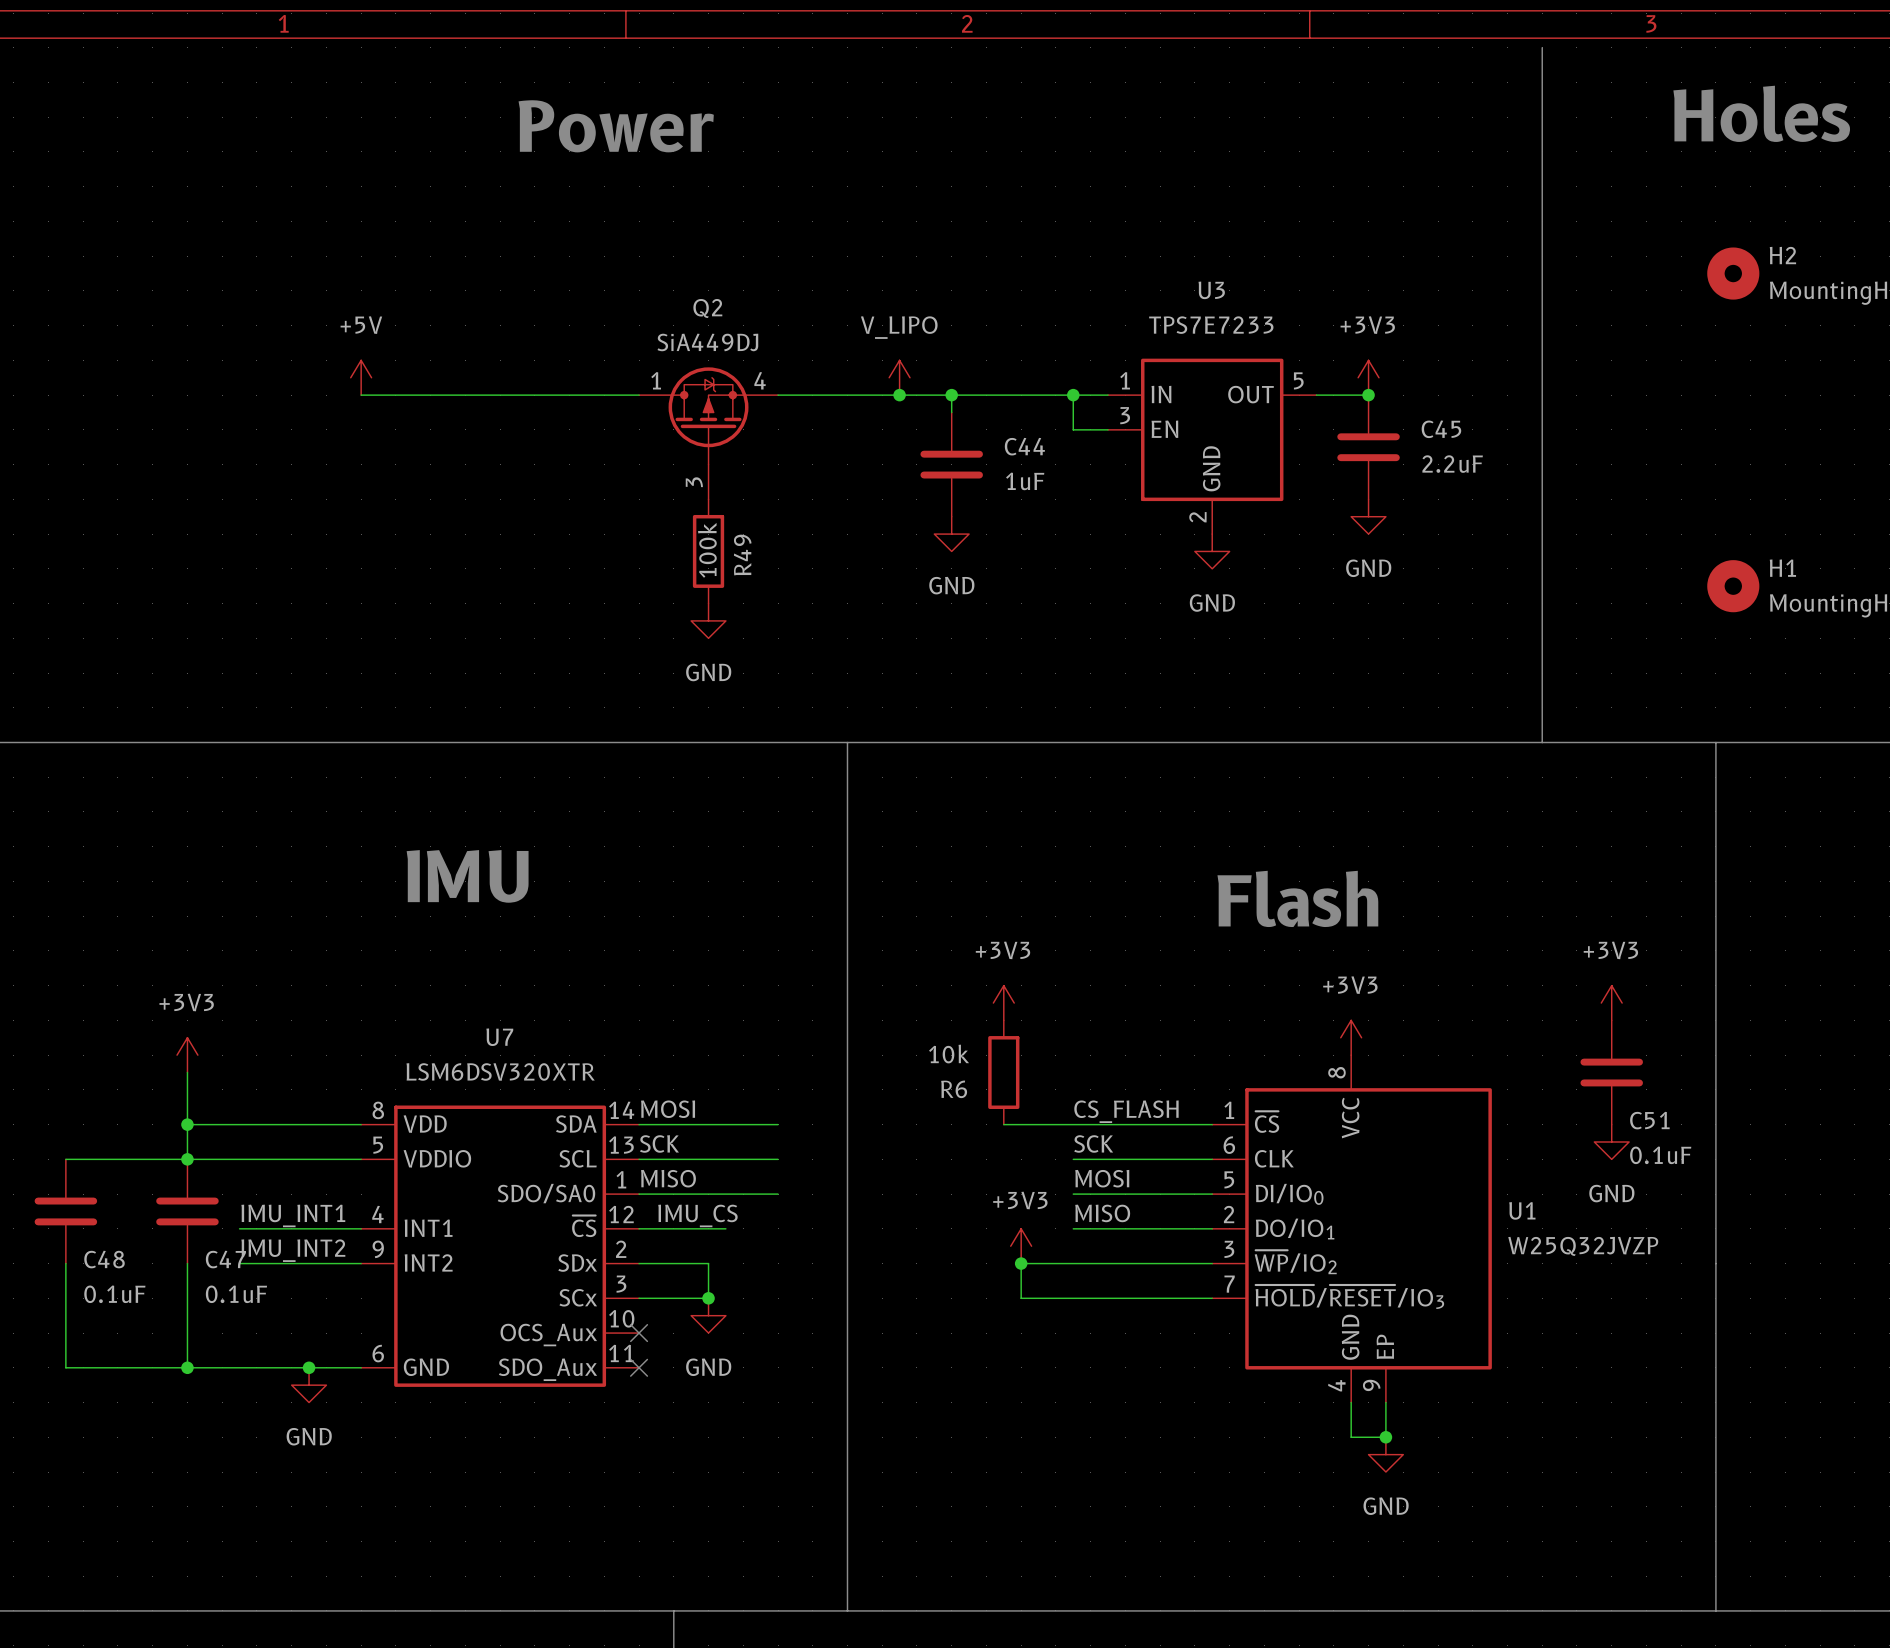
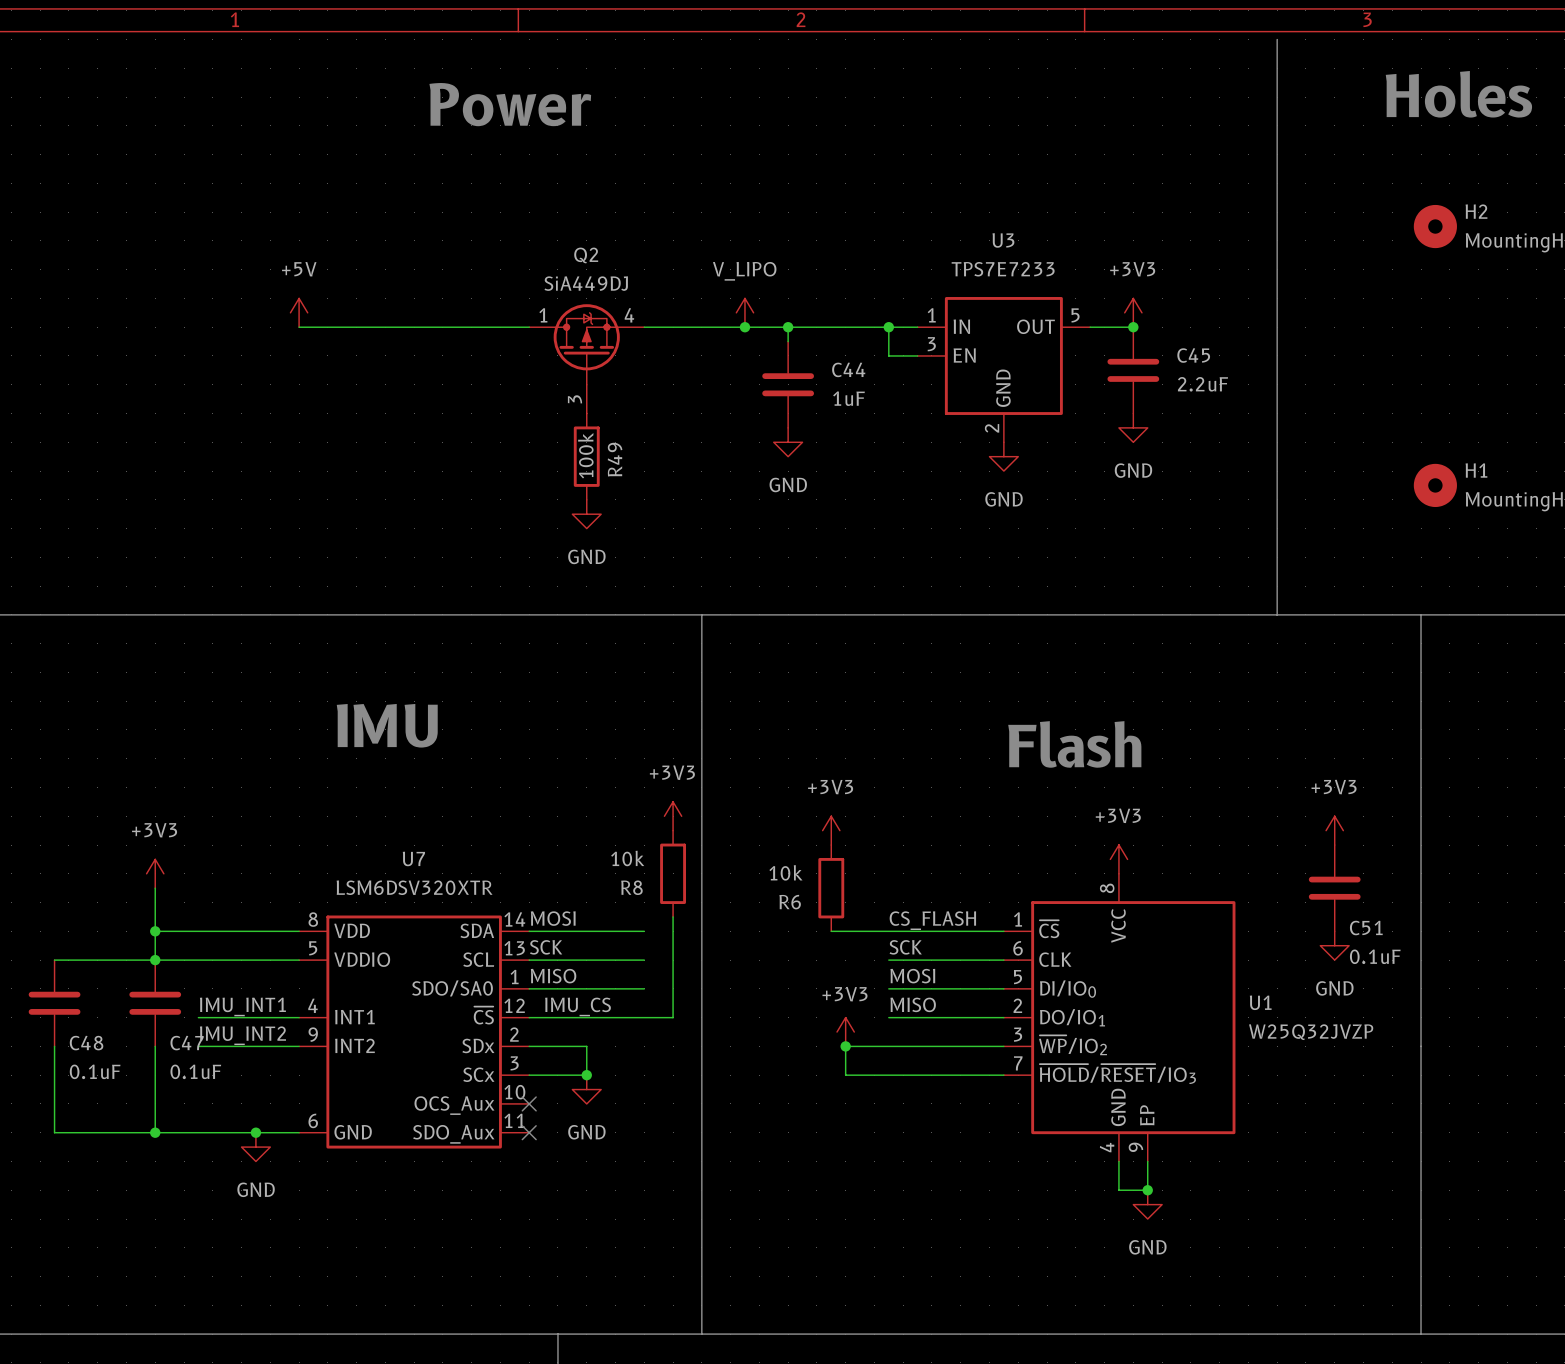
power symbol: none -> +3V3 (673, 816)
R8: none -> 10k (673, 873)
wire: none -> (673, 916) (673, 1017) (601, 1017)

